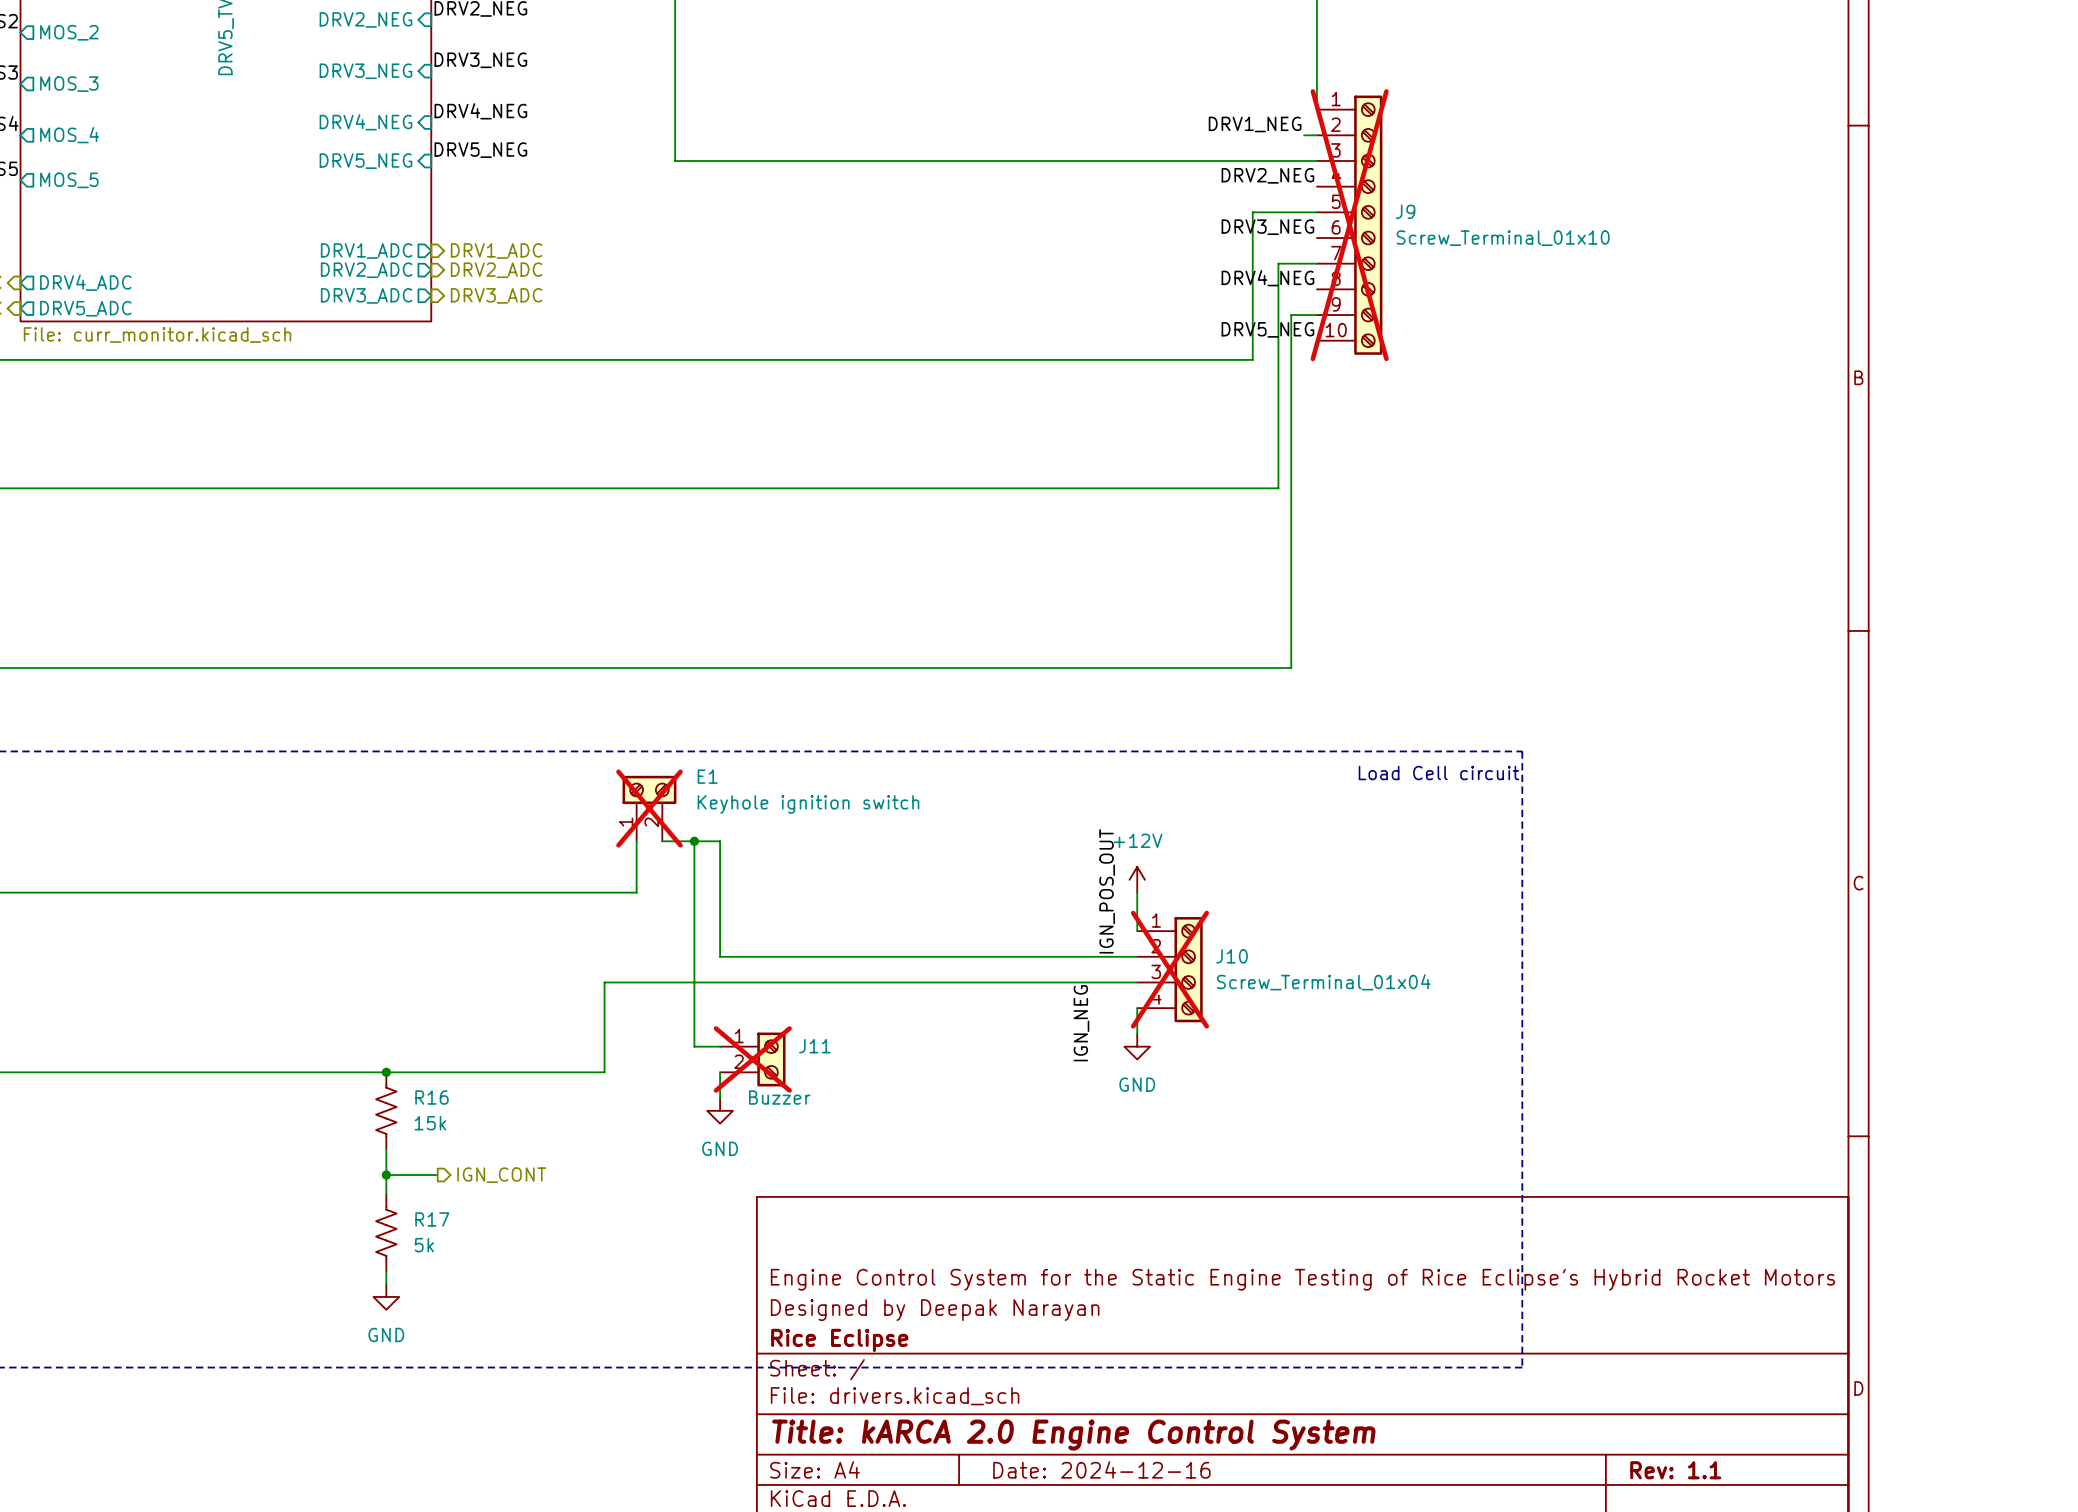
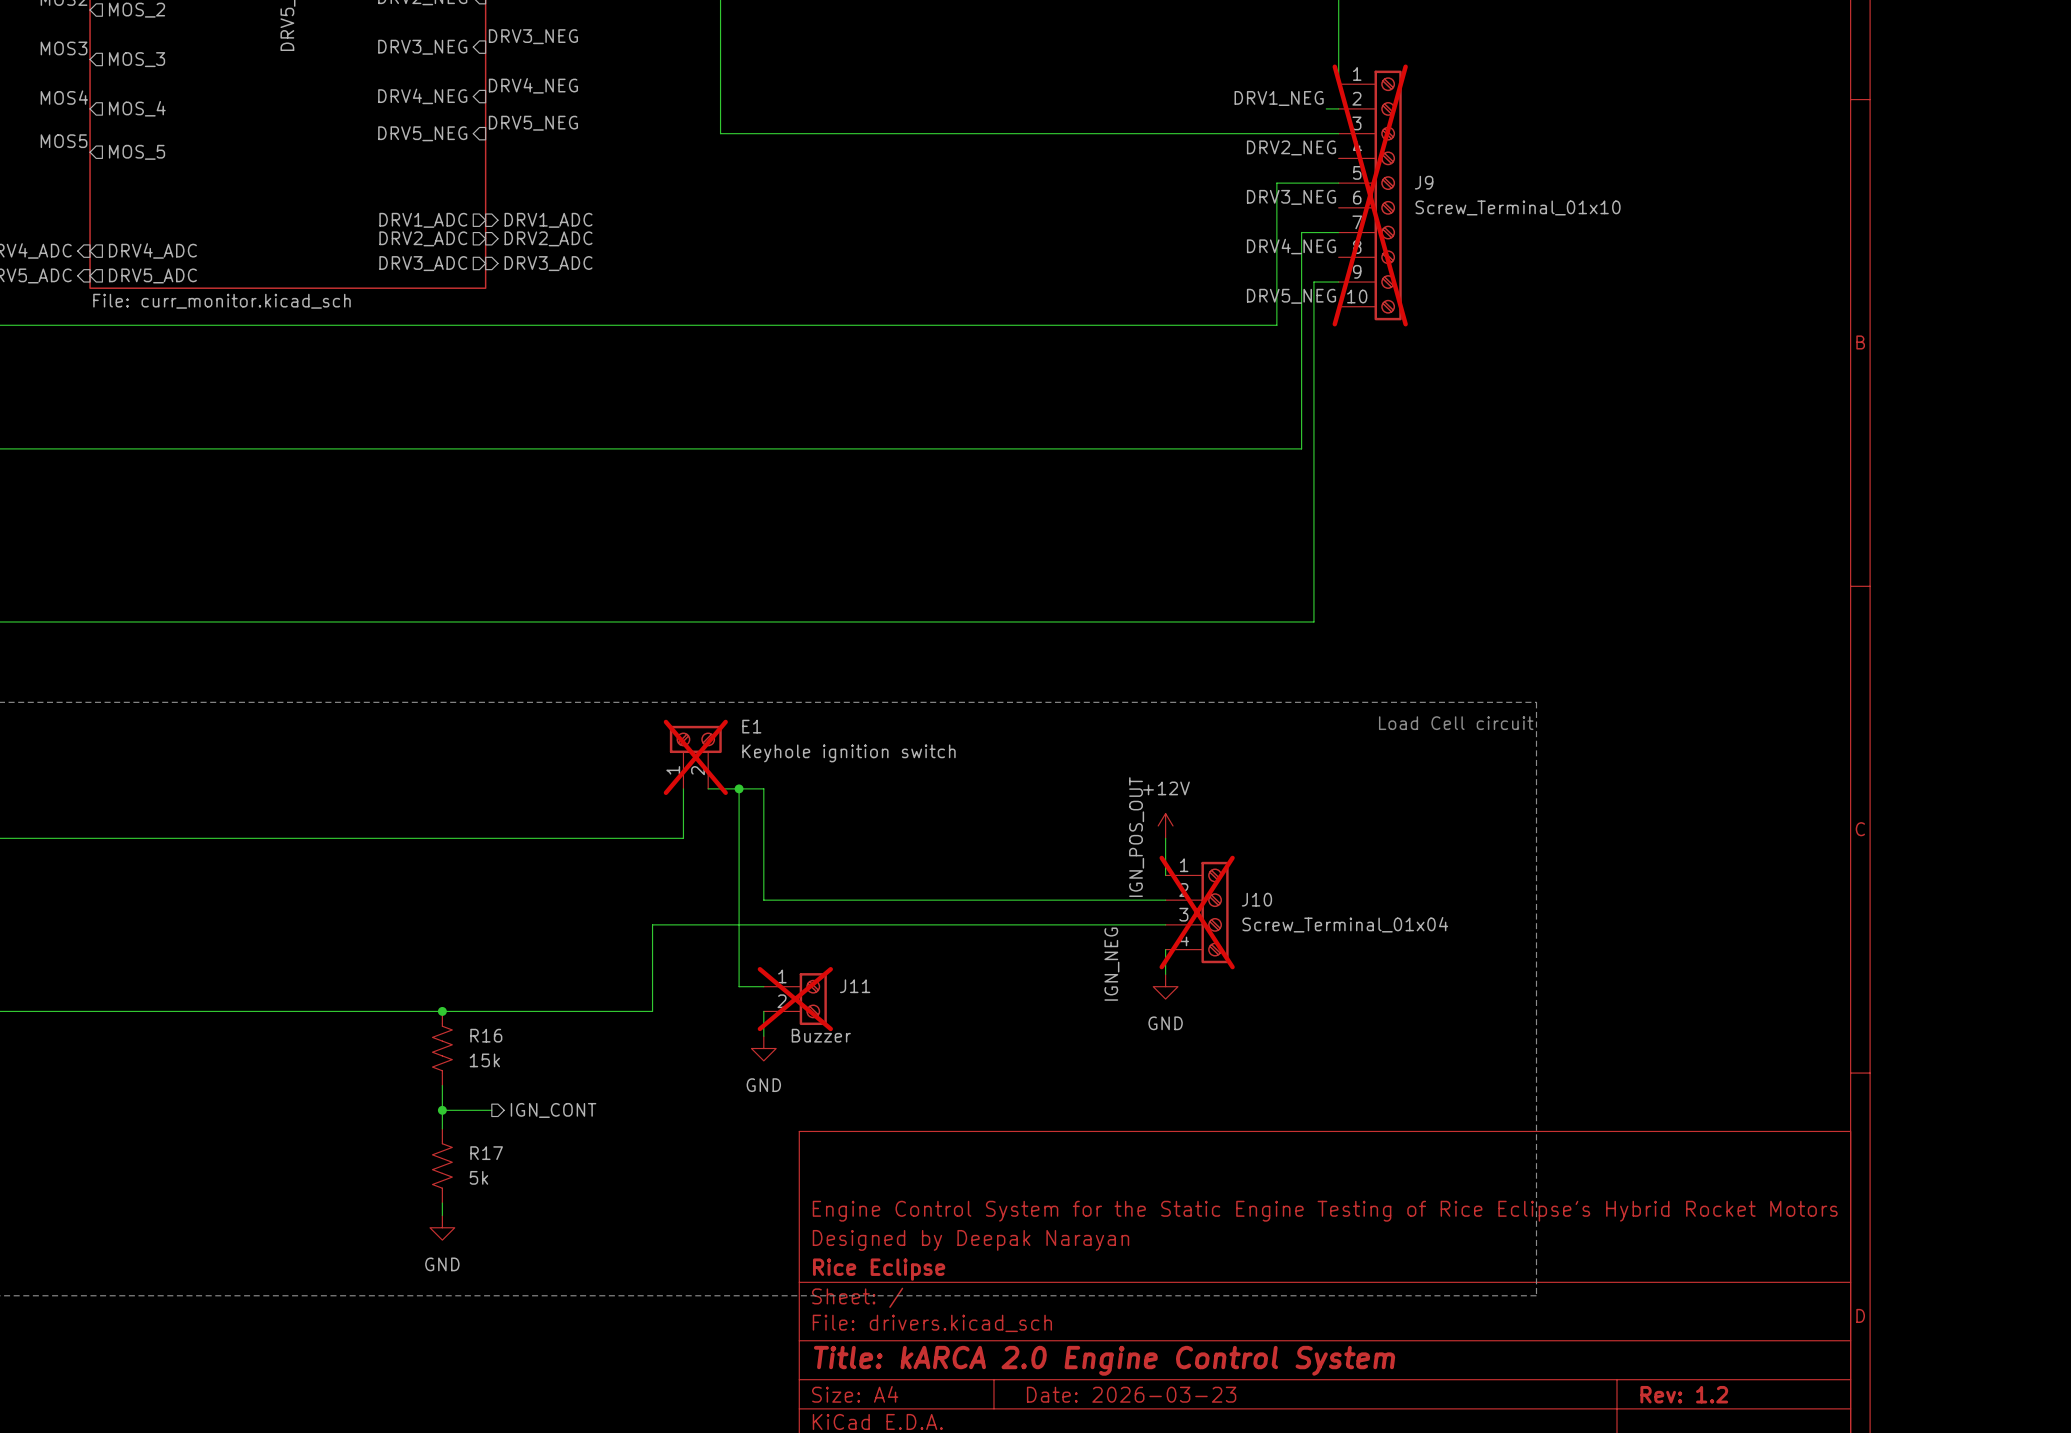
title block: Date: 2024-12-16 (1101, 1469) -> Date: 2026-03-23 (1131, 1394)
title block: Rev: 1.1 (1675, 1470) -> Rev: 1.2 (1684, 1394)

